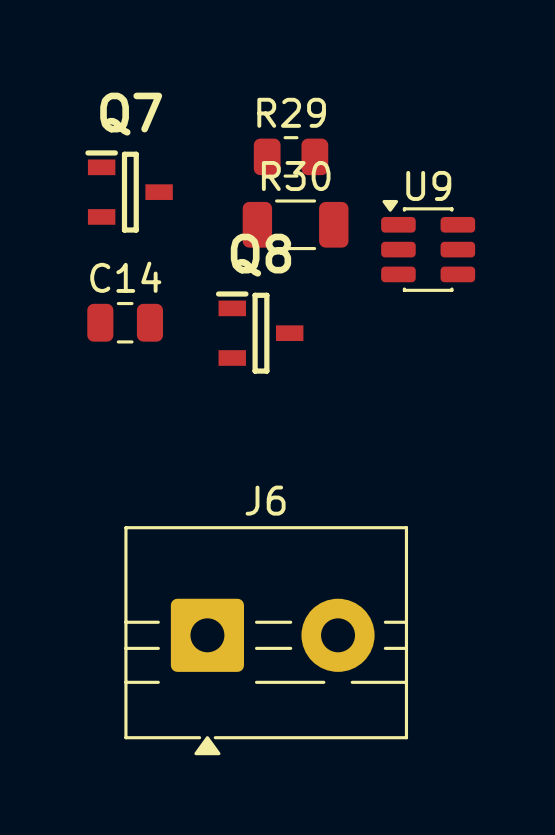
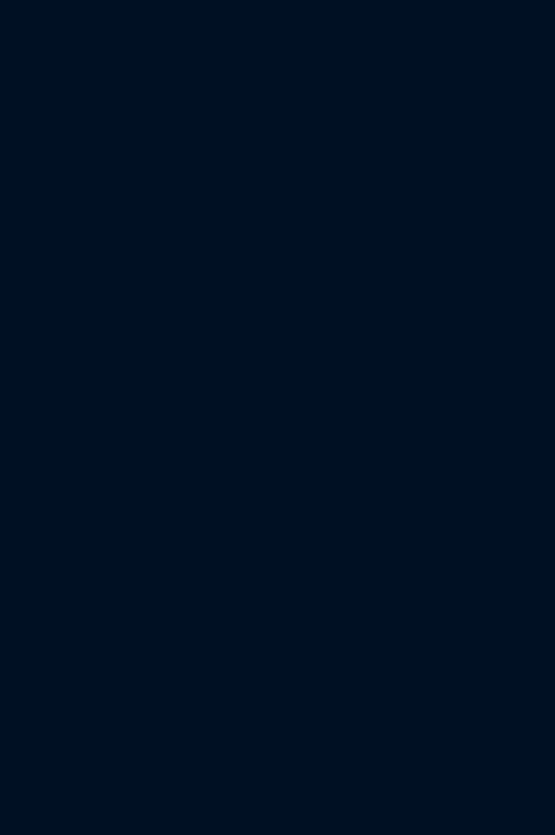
R29: (291, 156) -> none
Q7: (129, 191) -> none
R30: (295, 224) -> none
U9: (428, 245) -> none
C14: (125, 322) -> none
Q8: (259, 332) -> none
J6: (266, 640) -> none

